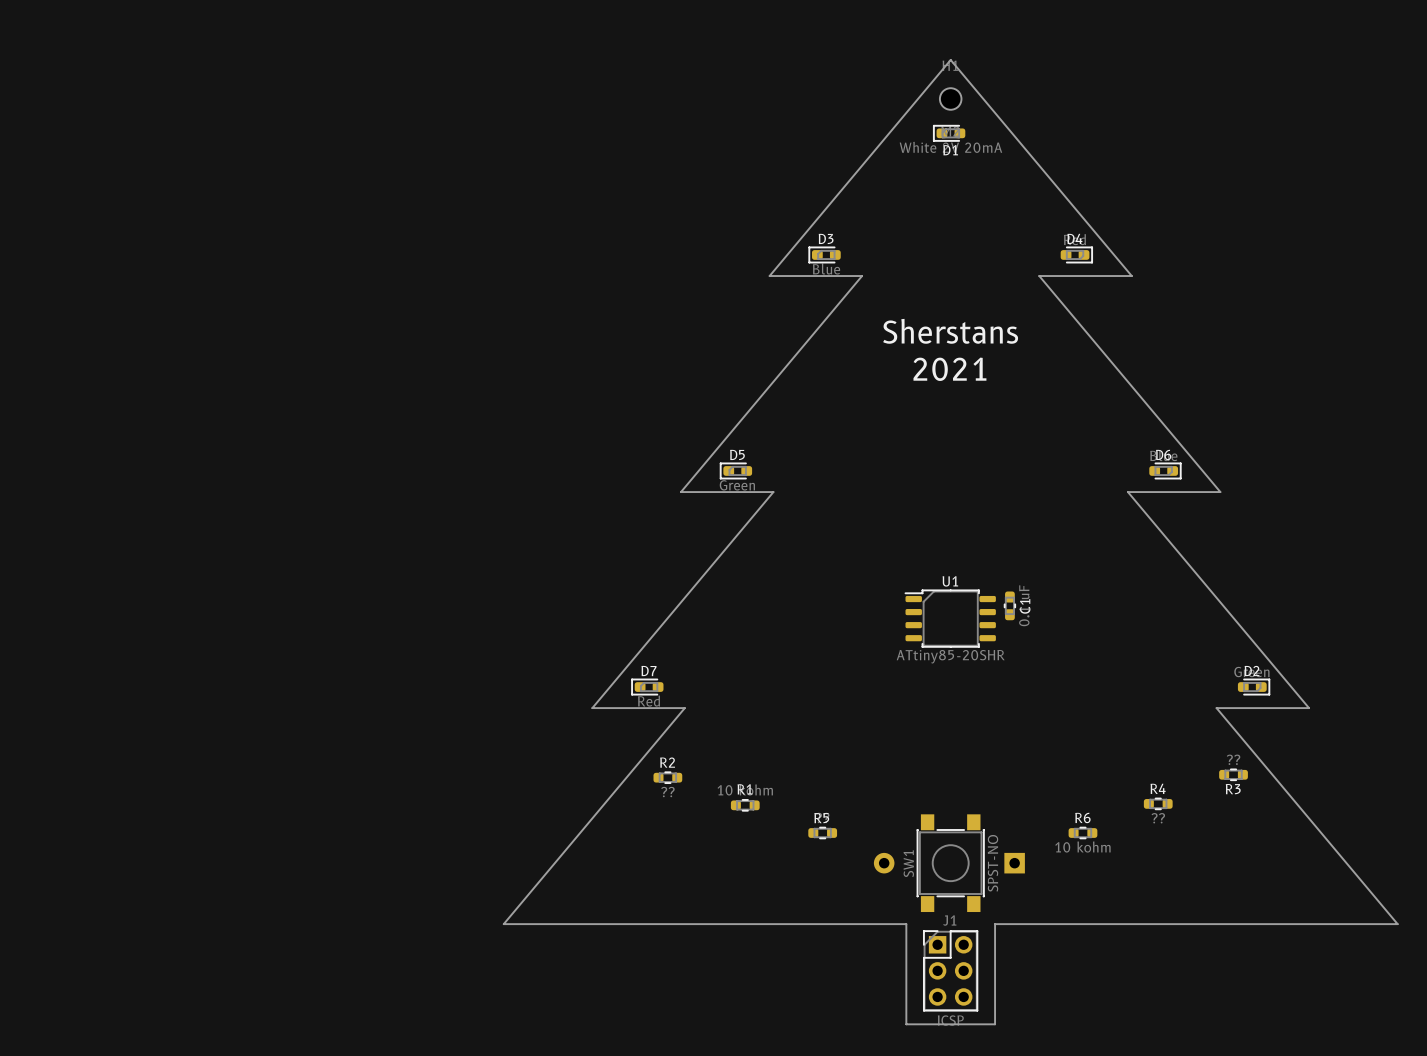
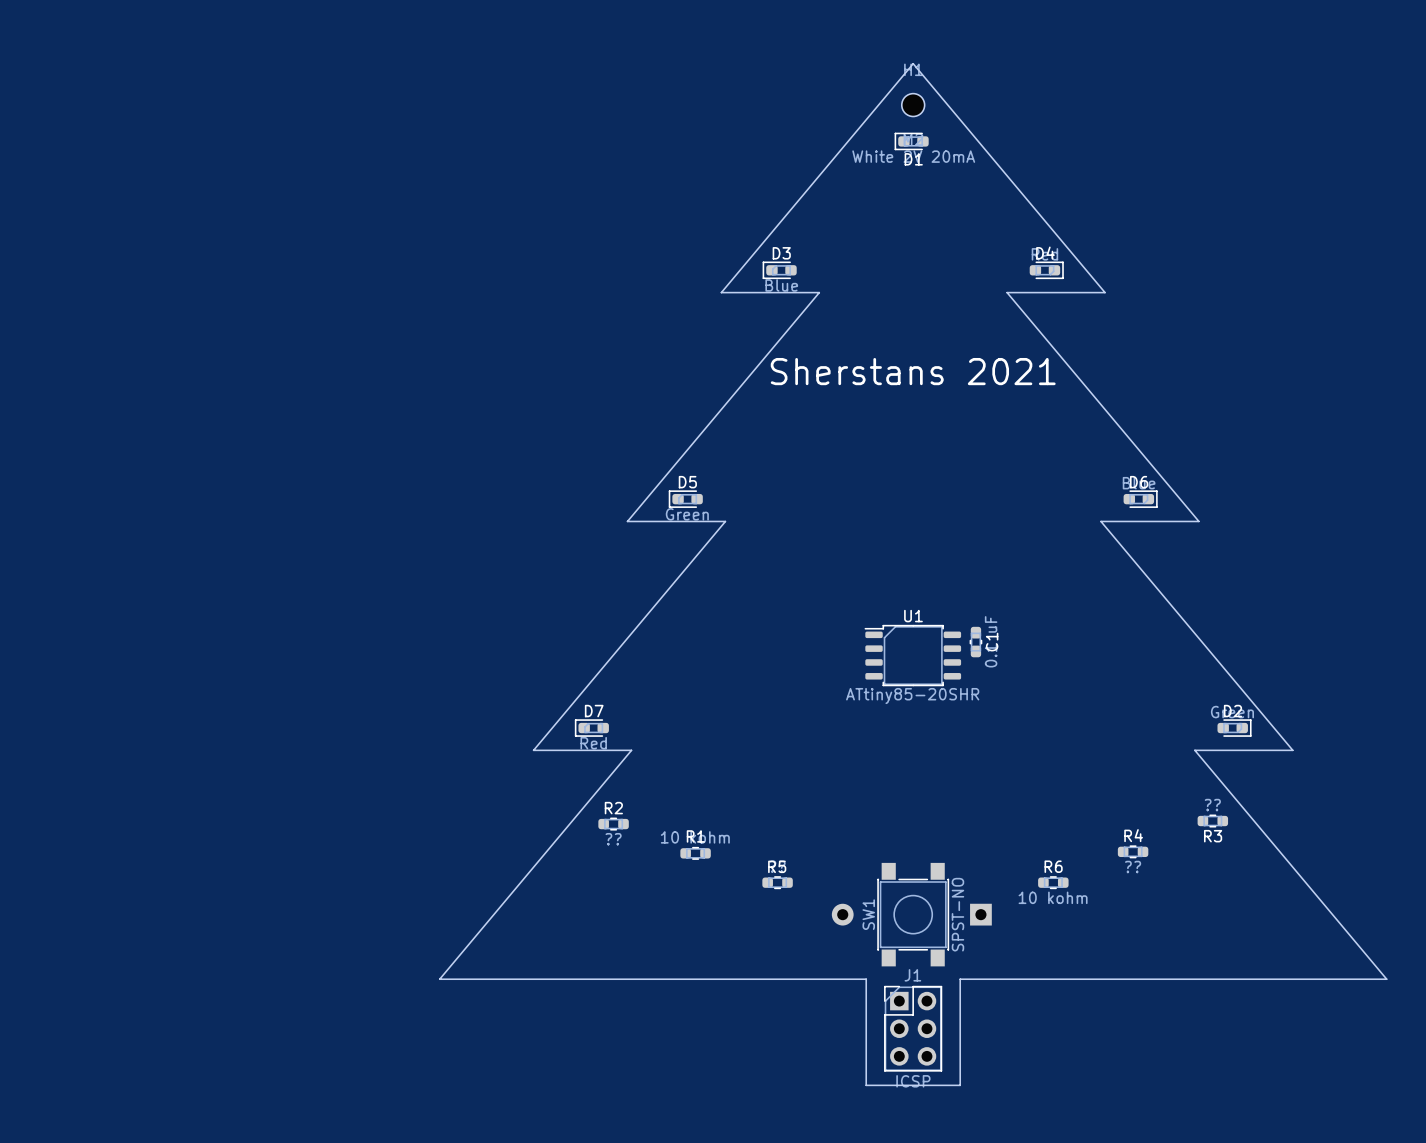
text: Sherstans (950, 331) -> Sherstans 2021 (913, 371)
text: 2021 (949, 369) -> none

